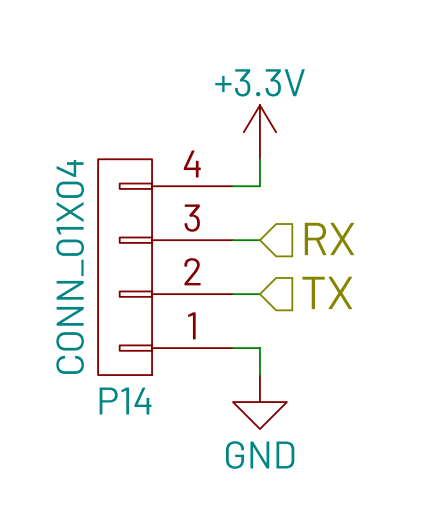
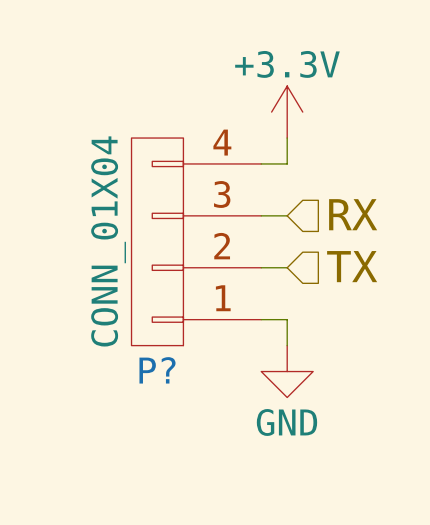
P14 name: P14 (125, 401) -> P? (157, 370)

